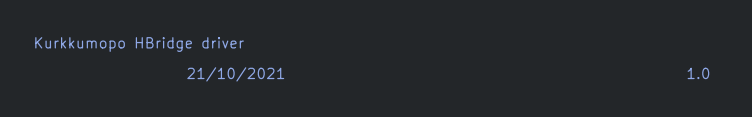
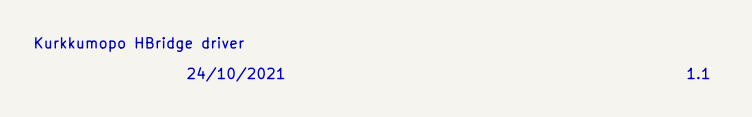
text: 1.0 (698, 73) -> 1.1 (698, 73)
text: 21/10/2021 (235, 74) -> 24/10/2021 (235, 74)

